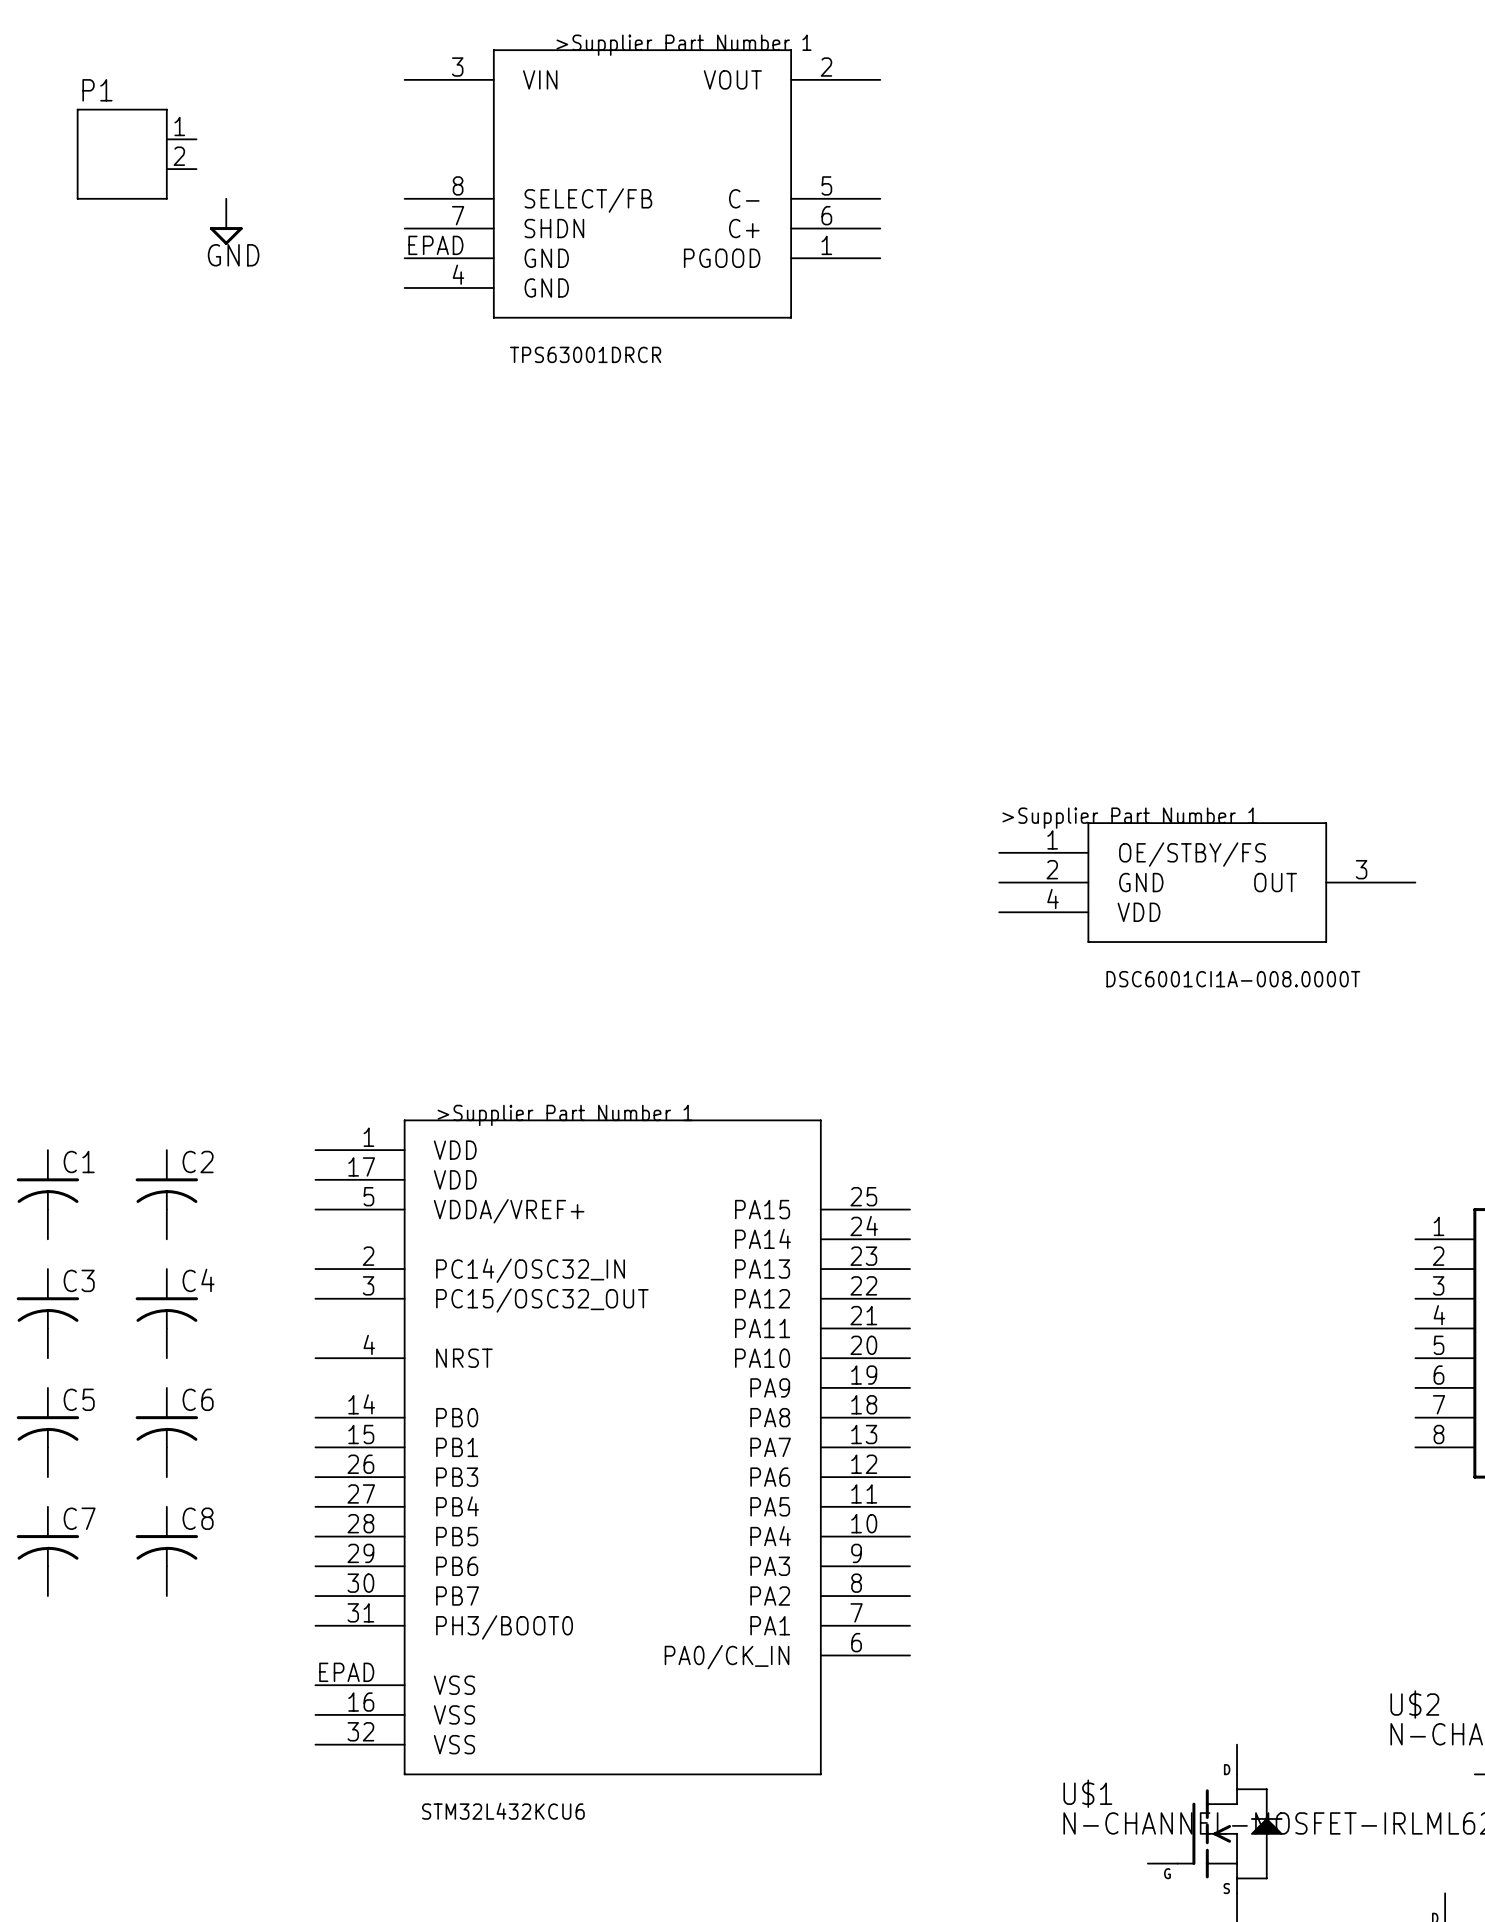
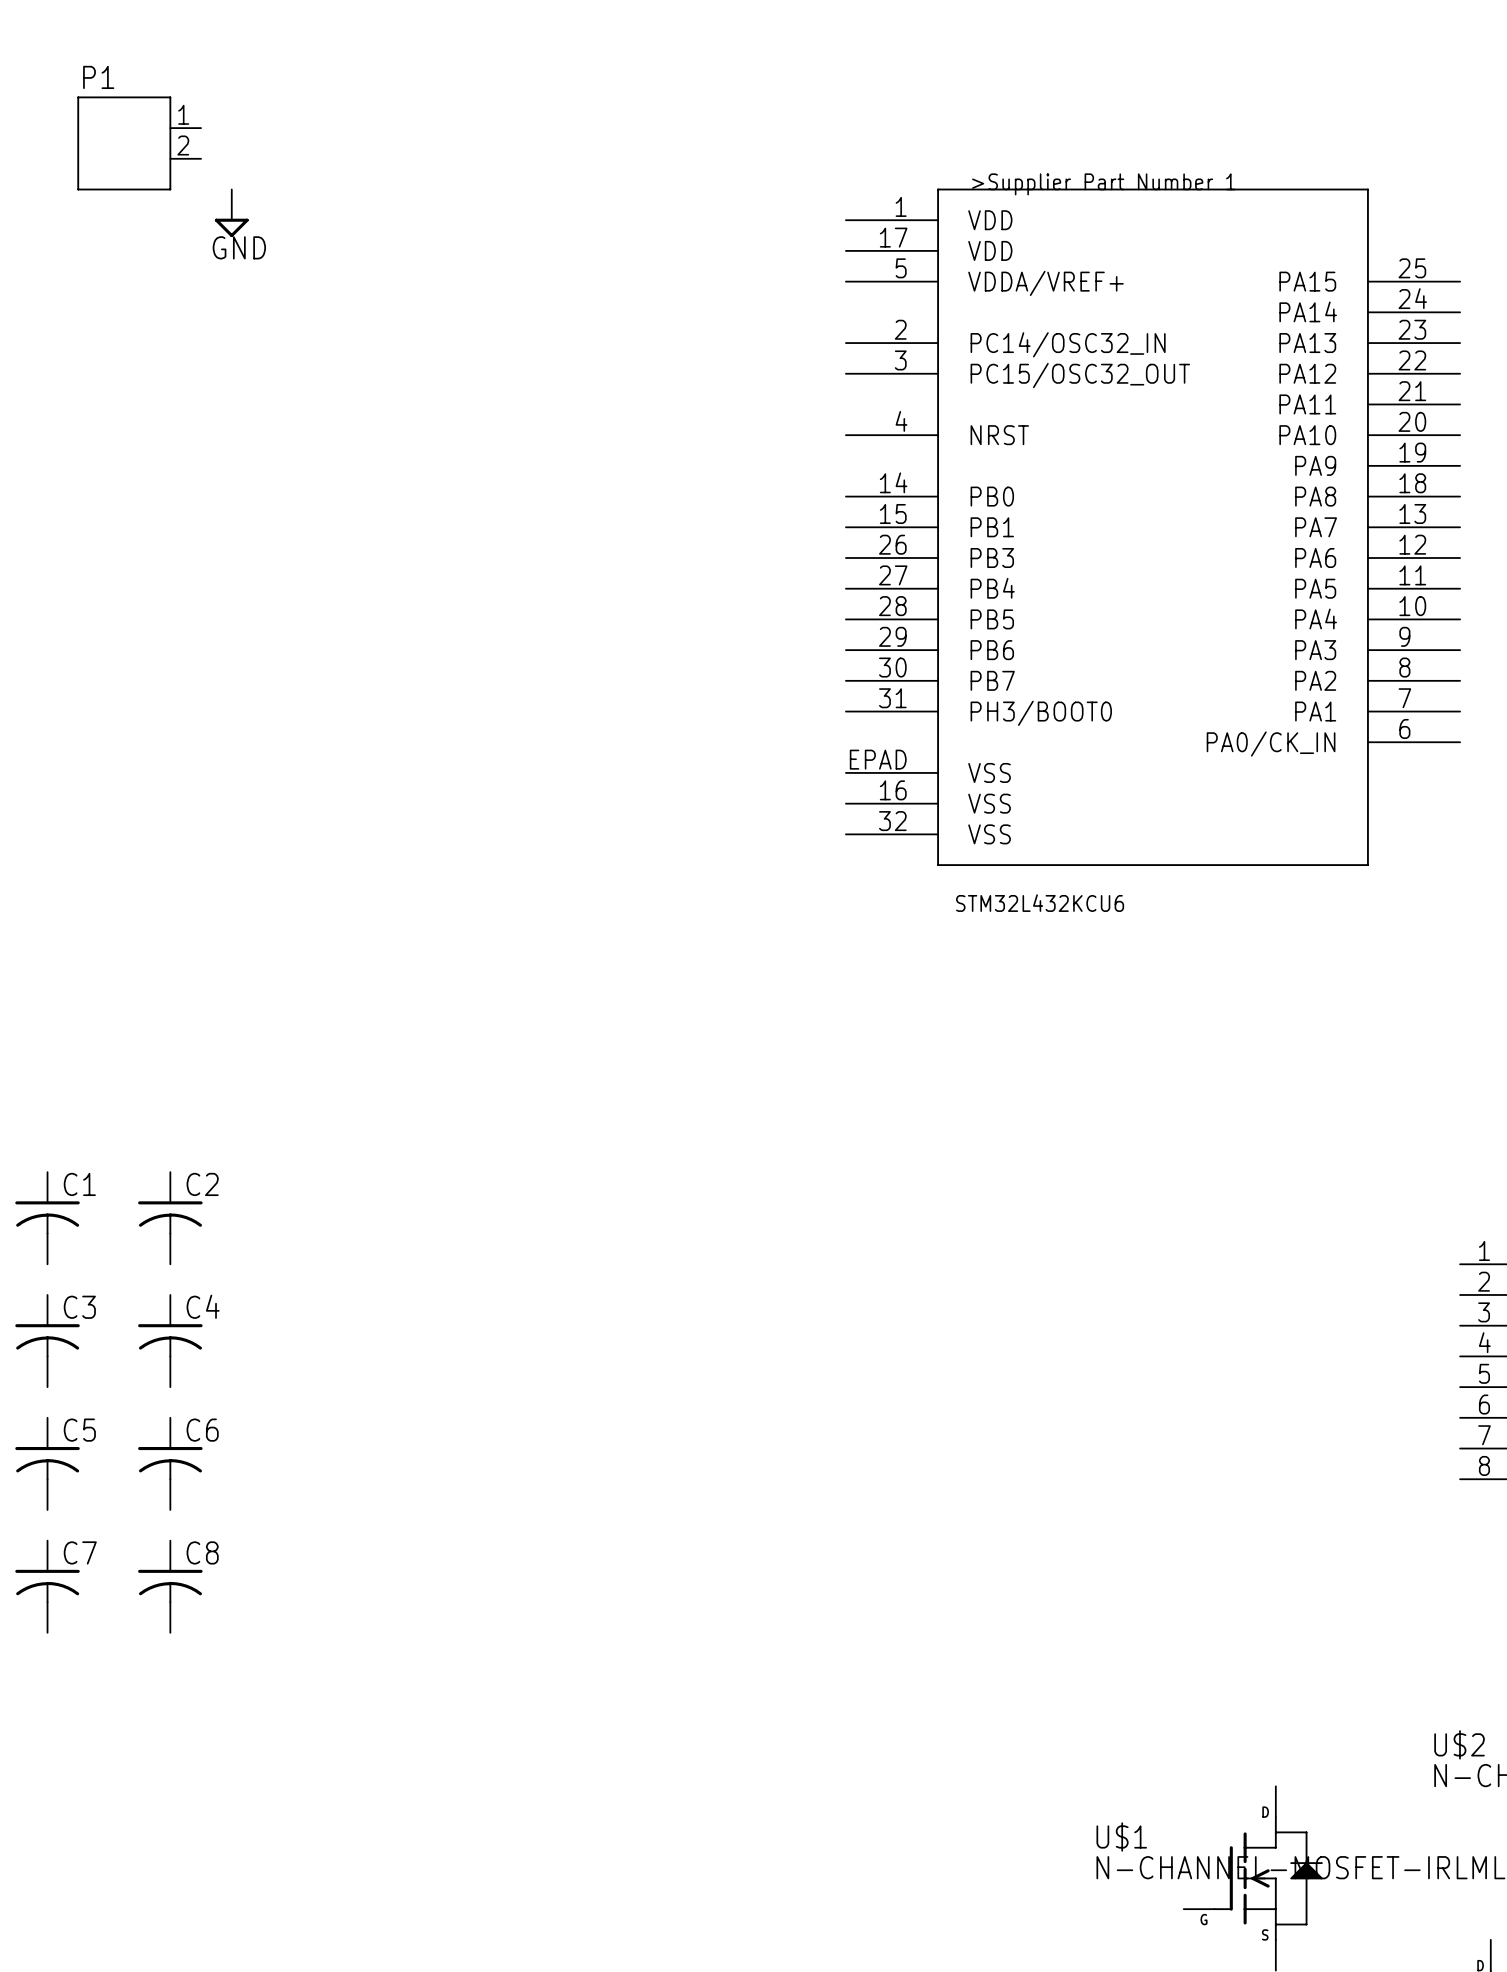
part: TPS63001DRCR (642, 183) -> none
part: none -> STM32L432KCU6 (1153, 527)
part: DSC6001CI1A-008.0000T (1207, 882) -> none
part: STM32L432KCU6 (612, 1447) -> none

